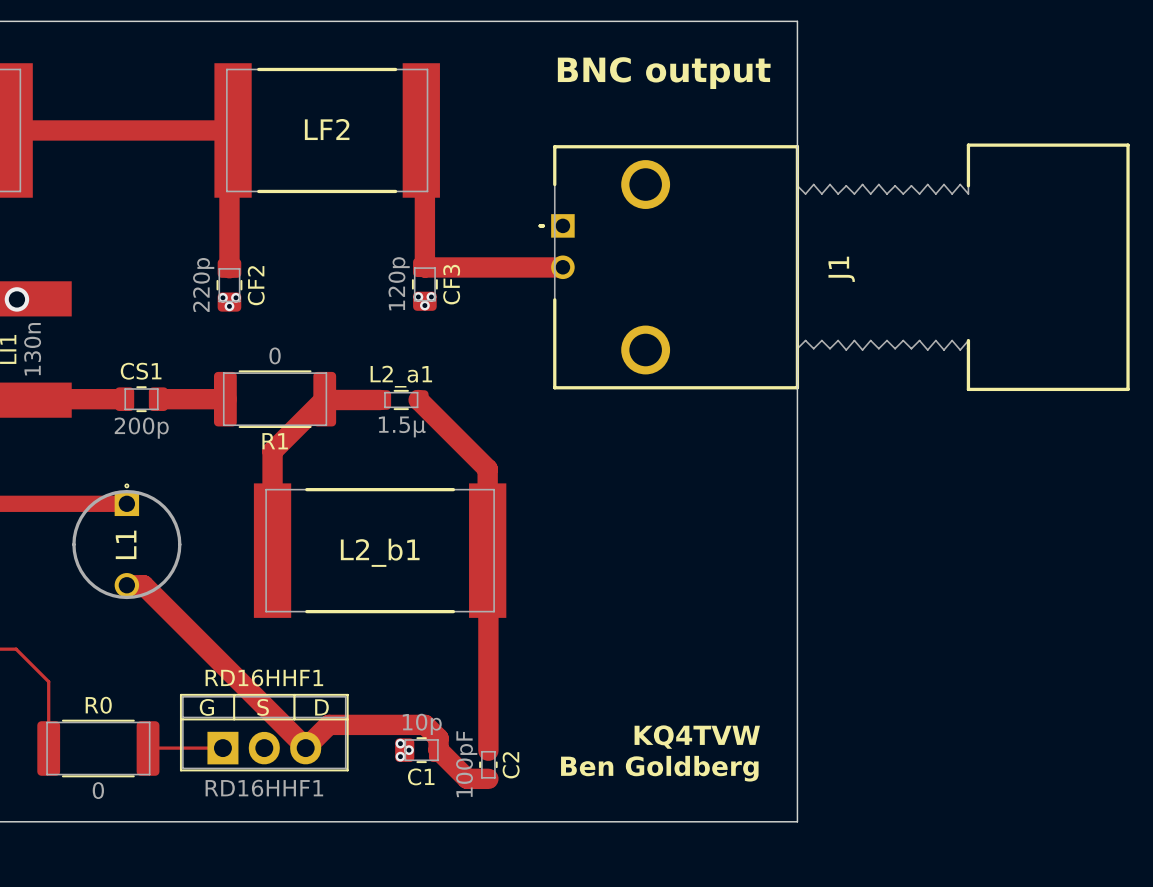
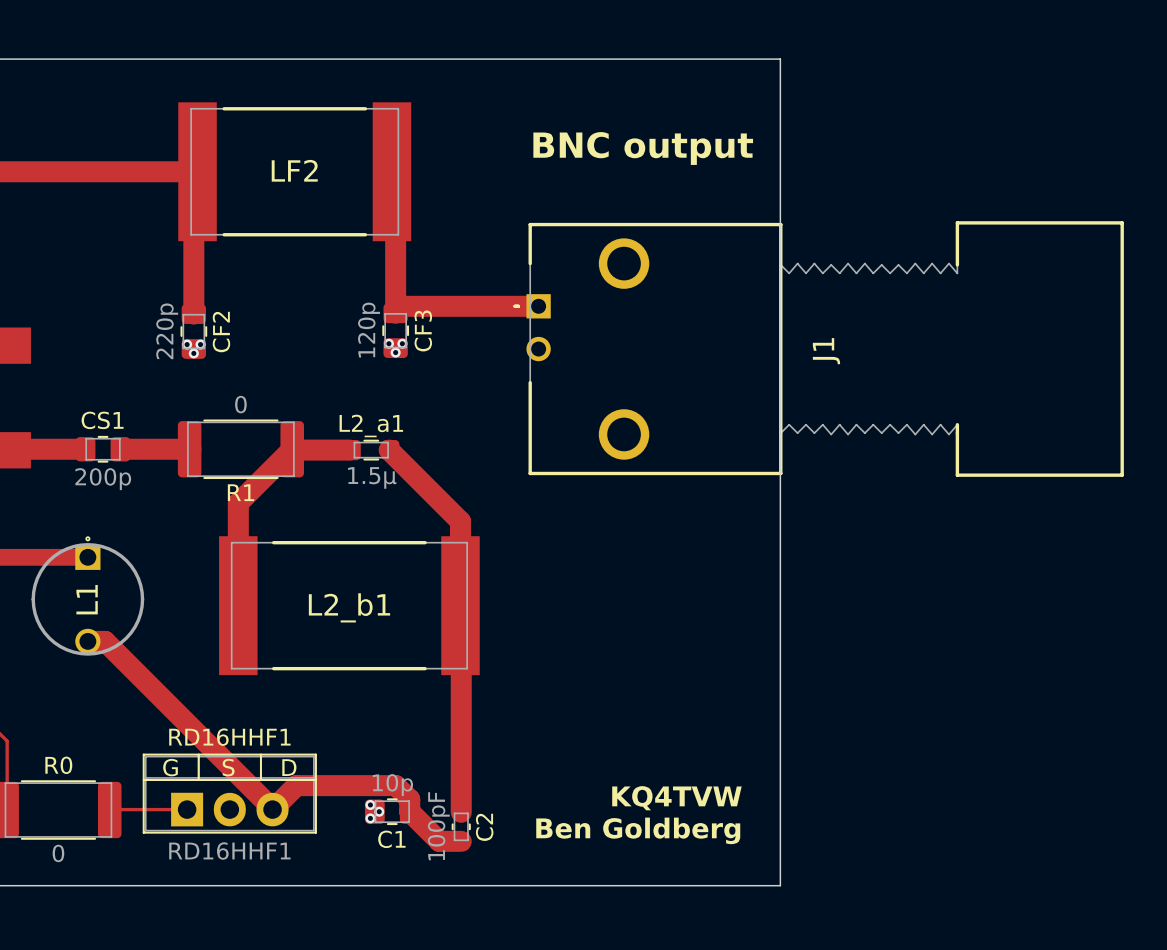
text position: BNC output (664, 73) -> BNC output (643, 148)
track: none -> (402, 306) (538, 306)
track: (424, 267) (562, 267) -> none
J1 position: (834, 267) -> (818, 349)

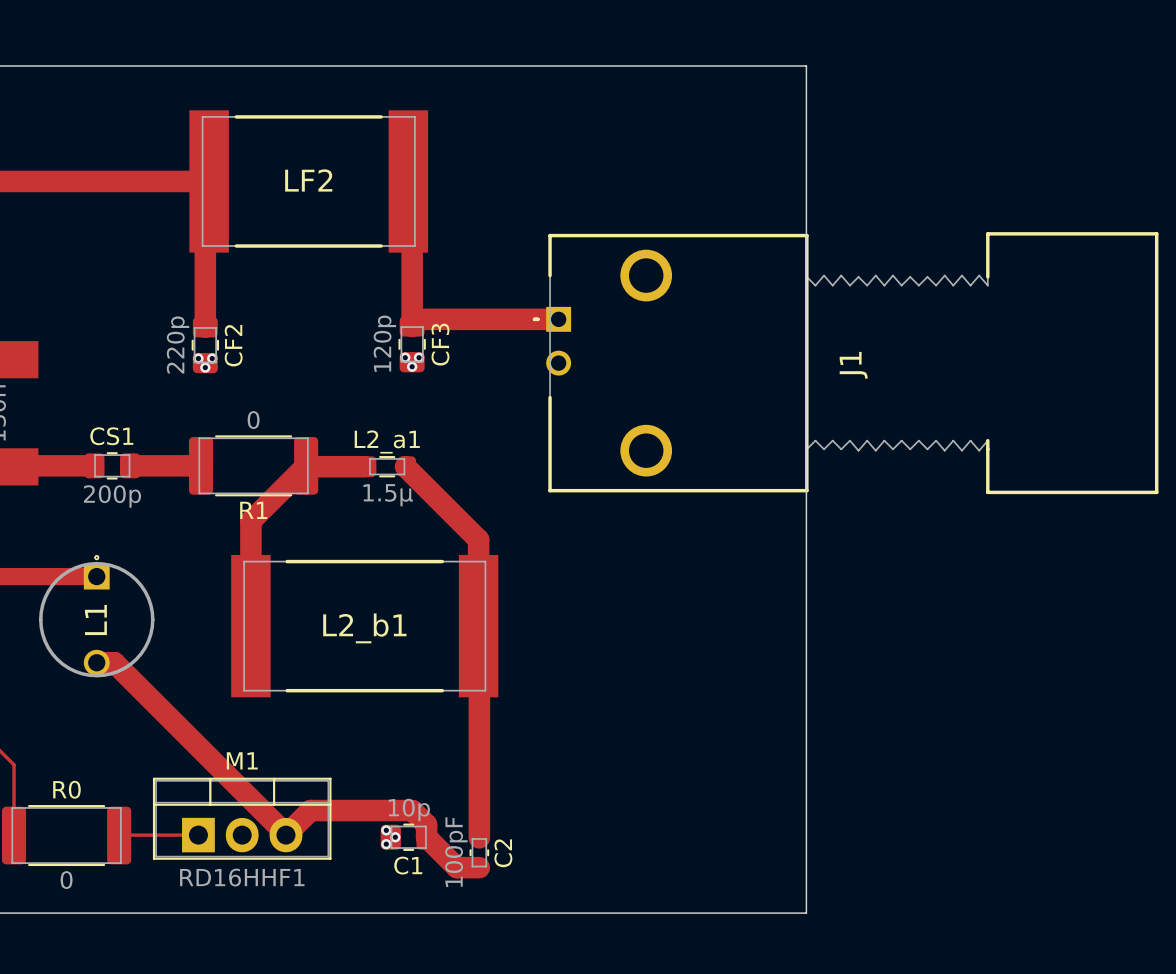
text: BNC output (643, 148) -> none
RD16HHF1 name: RD16HHF1 (229, 737) -> M1 (242, 760)
text: G (170, 767) -> none
text: S (228, 767) -> none
text: D (289, 767) -> none
text: KQ4TVW (676, 798) -> none
text: Ben Goldberg (638, 830) -> none

